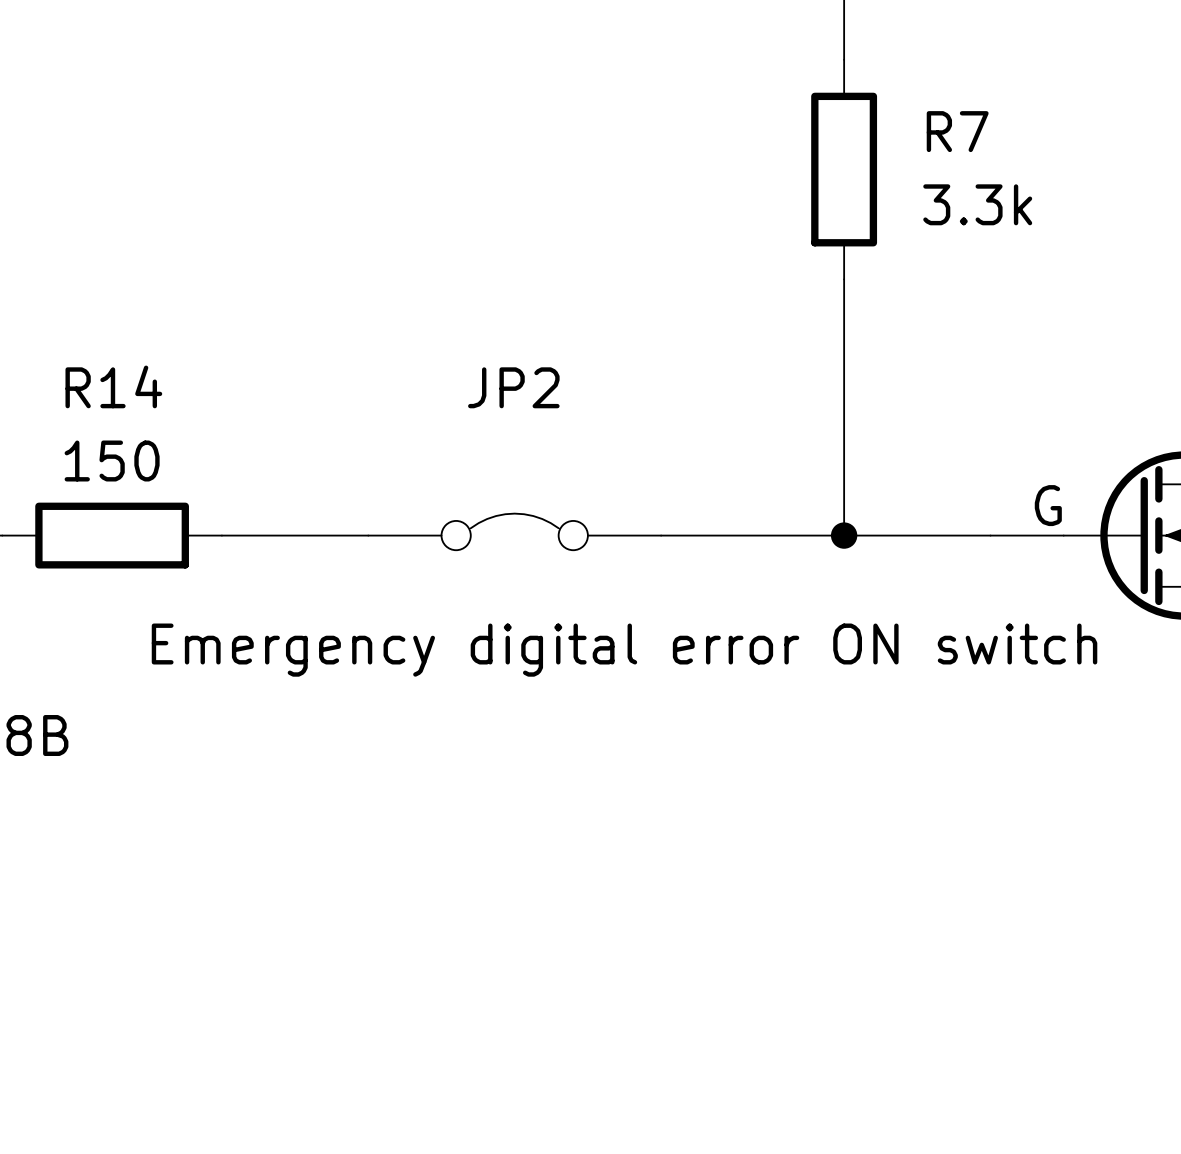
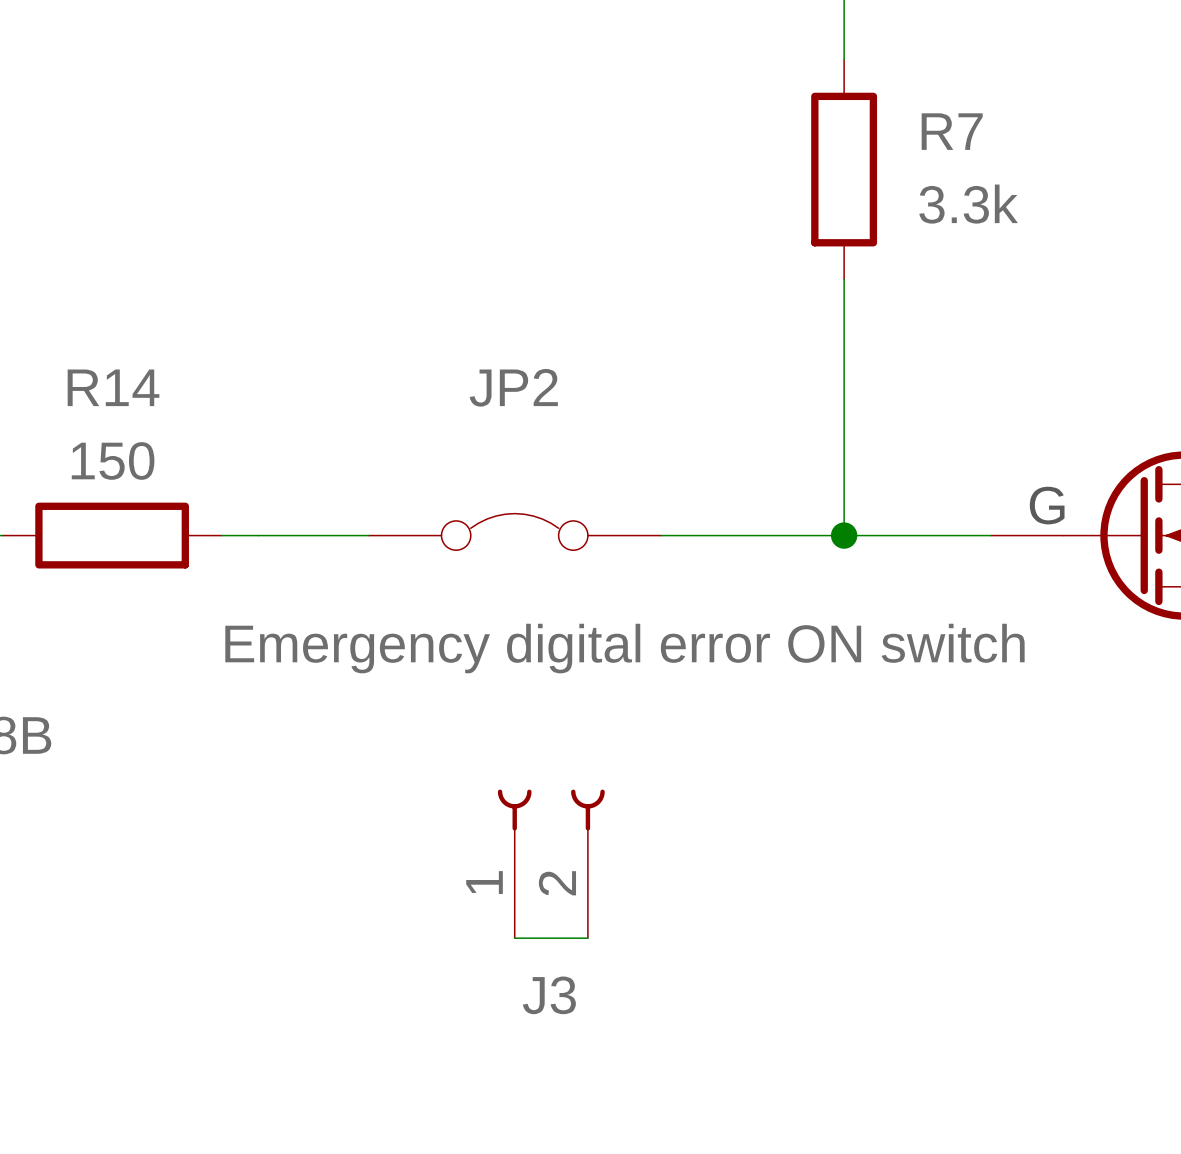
J3: none -> (551, 863)
wire: none -> (514, 938) (587, 938)

